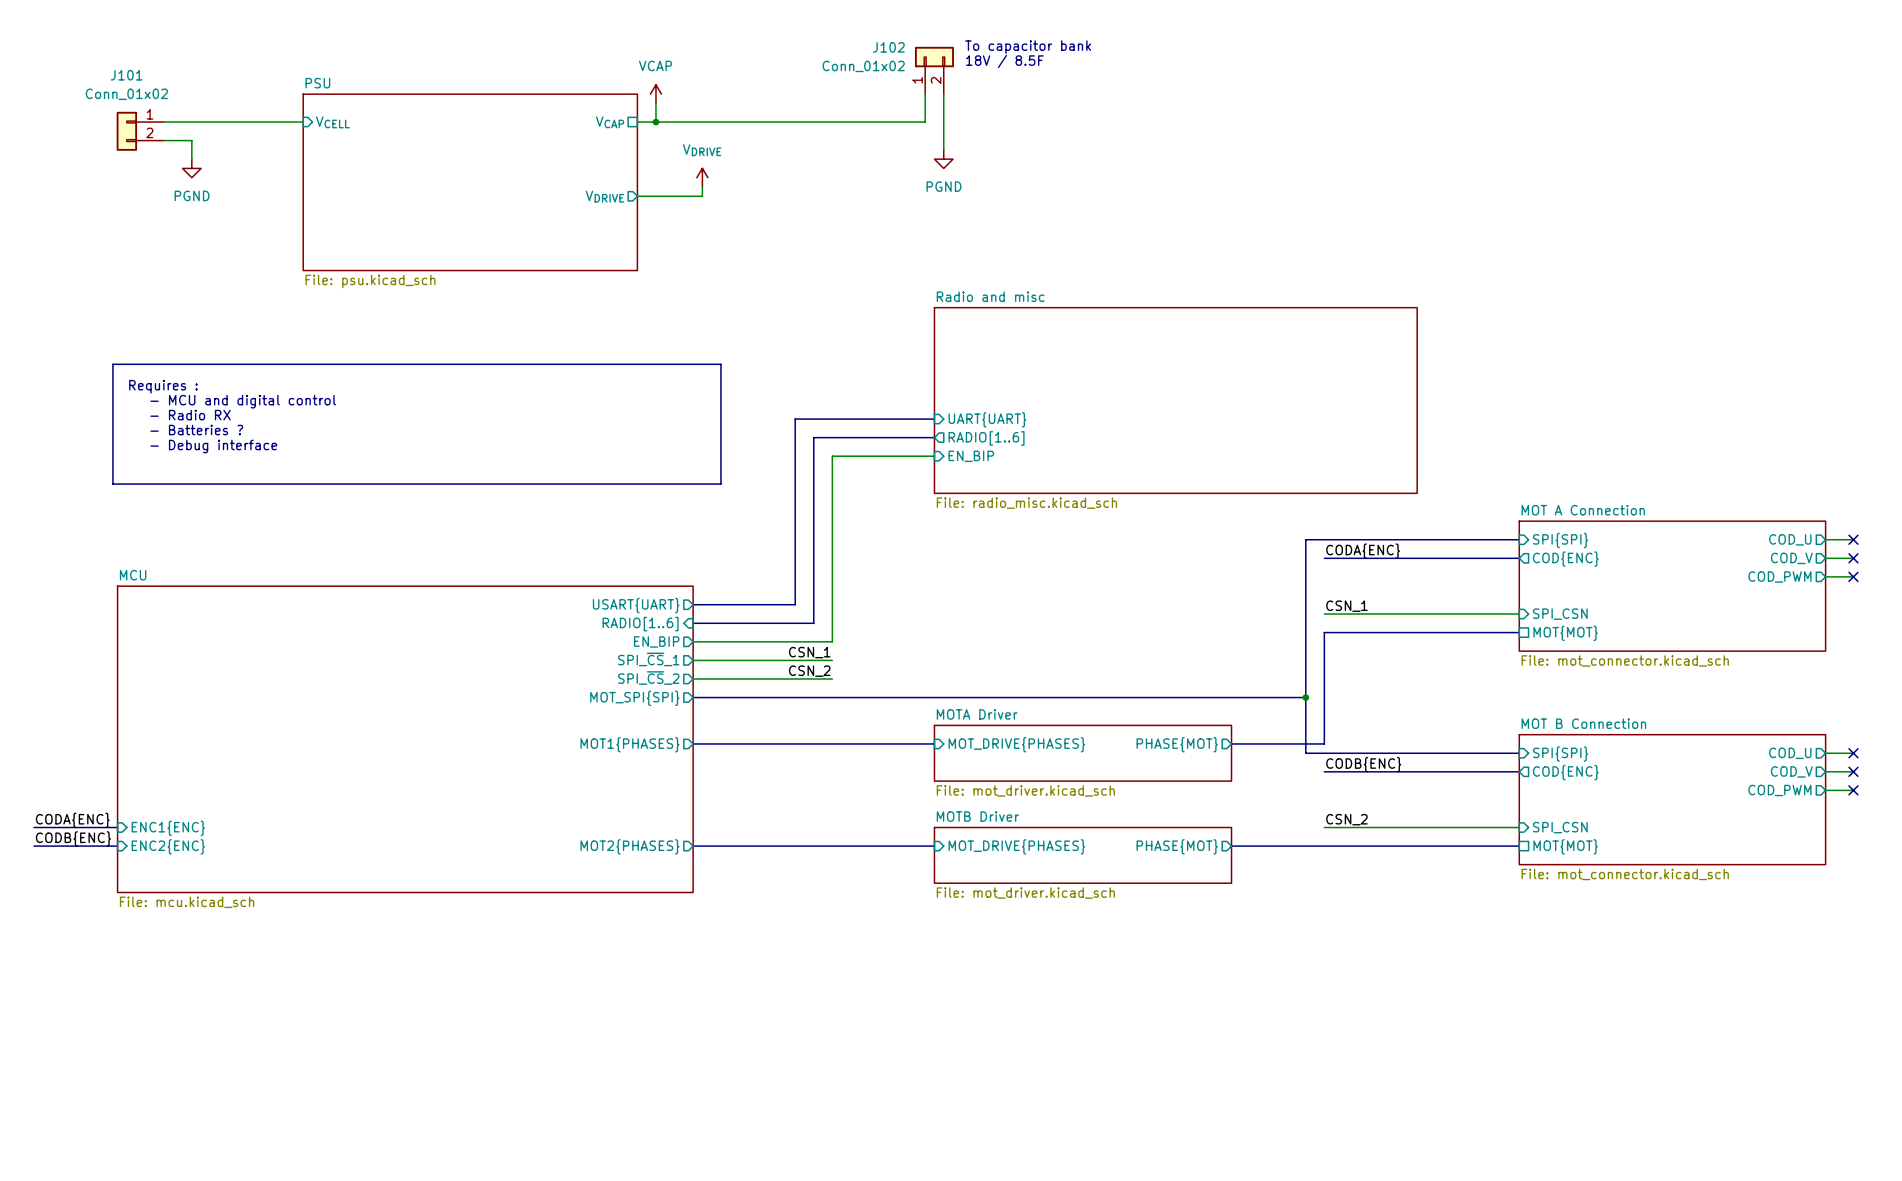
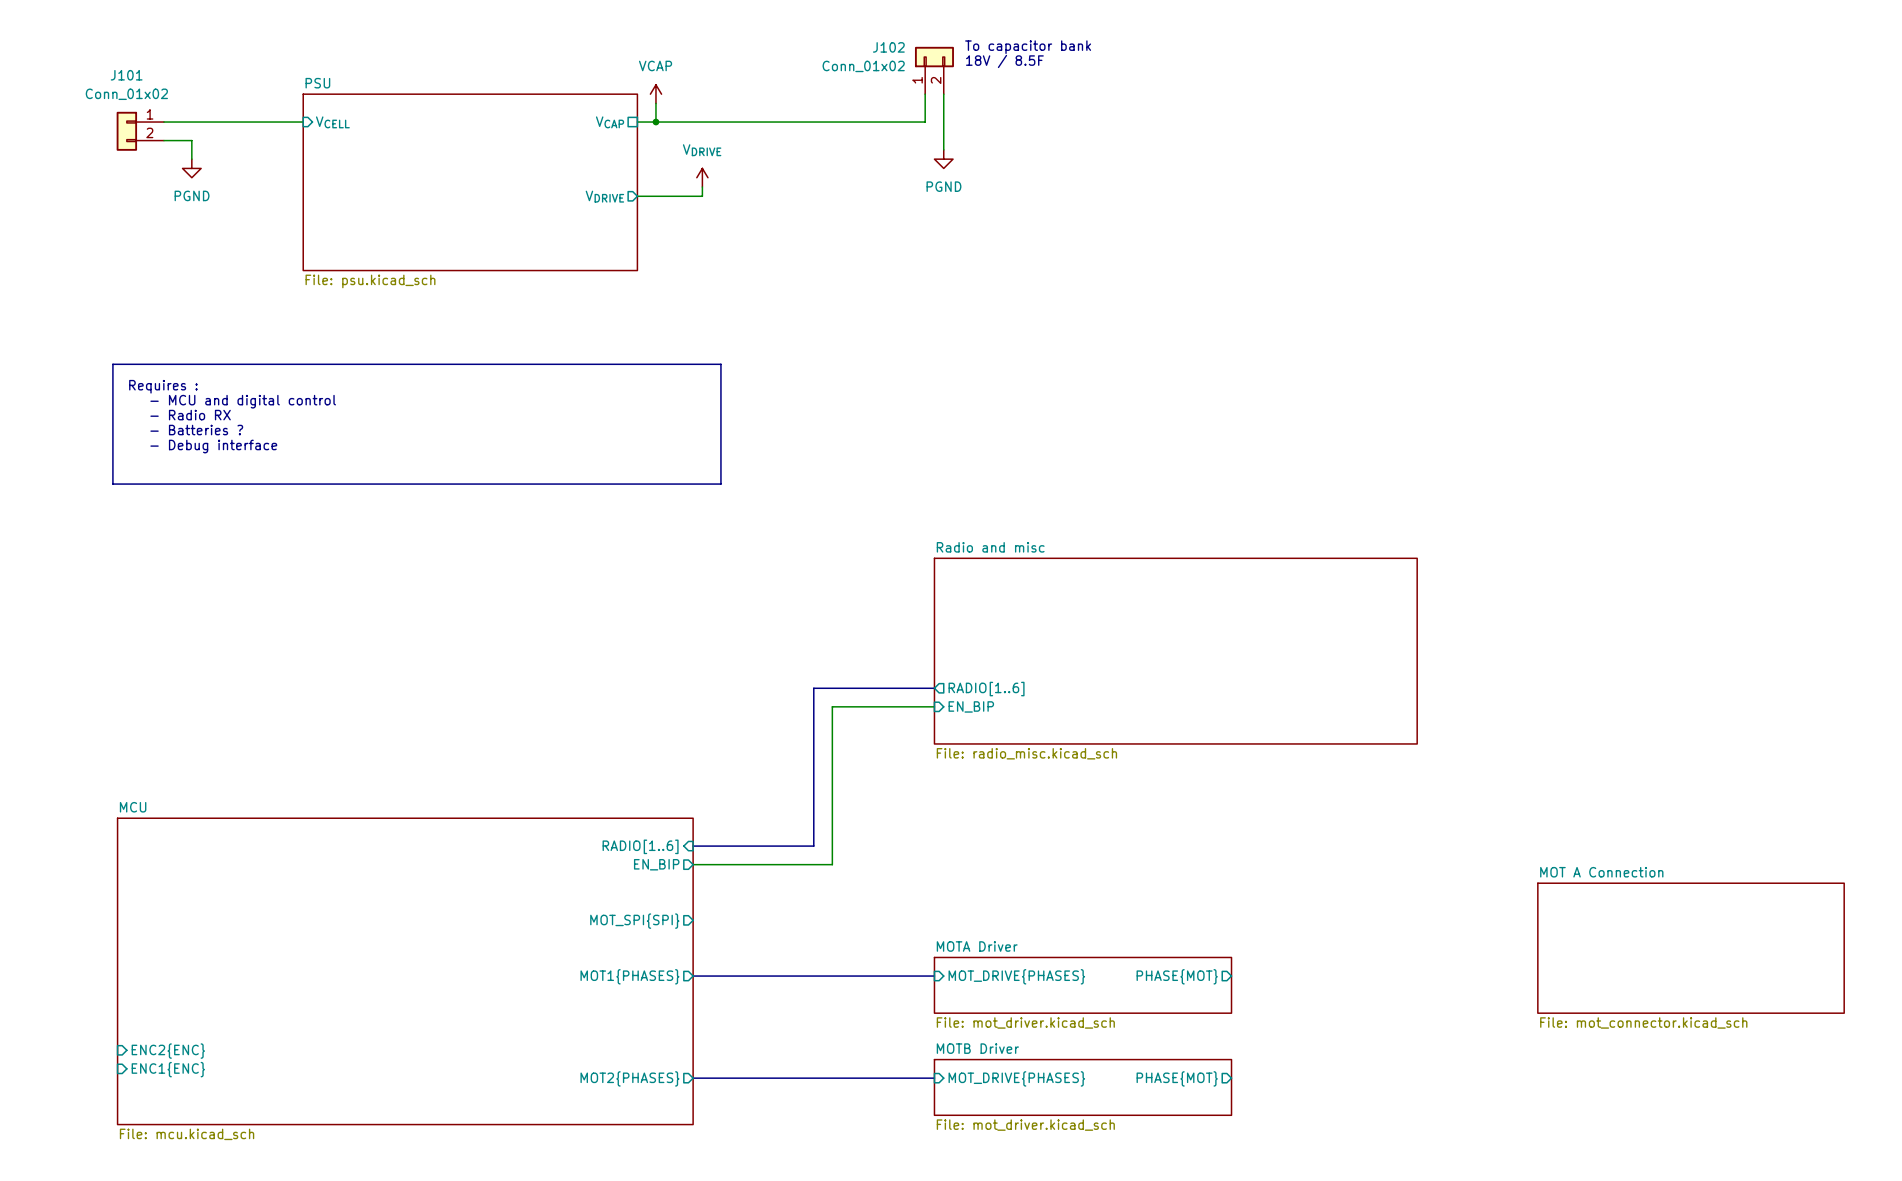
sheet Radio and misc: File: radio_misc.kicad_sch (1175, 400) -> none
bus: (934, 419) (795, 419) (795, 604) (693, 604) -> none
sheet pin: UART{UART} (987, 419) -> none
bus: (934, 437) (813, 437) (813, 623) (693, 623) -> none
sheet pin: RADIO[1..6] (986, 438) -> none
wire: (934, 456) (832, 456) (832, 641) (693, 641) -> none
sheet pin: EN_BIP (971, 456) -> none
bus: (1519, 539) (1305, 539) (1305, 753) (1519, 753) -> none
sheet pin: COD_U (1790, 539) -> none
wire: (1825, 539) (1853, 539) -> none
no-connect mark: (1853, 539) -> none
sheet pin: SPI{SPI} (1560, 540) -> none
label: CODA{ENC} (1363, 551) -> none
bus: (1324, 558) (1519, 558) -> none
sheet pin: COD_V (1791, 558) -> none
wire: (1825, 558) (1853, 558) -> none
no-connect mark: (1853, 558) -> none
sheet pin: COD{ENC} (1565, 559) -> none
sheet pin: COD_PWM (1779, 576) -> none
wire: (1825, 576) (1853, 576) -> none
no-connect mark: (1853, 576) -> none
sheet MOT A Connection: File: mot_connector.kicad_sch (1672, 586) -> none
sheet pin: USART{UART} (636, 605) -> none
label: CSN_1 (1346, 606) -> none
wire: (1324, 614) (1519, 614) -> none
sheet pin: SPI_CSN (1560, 614) -> none
sheet pin: RADIO[1..6] (640, 624) -> none
bus: (1519, 632) (1324, 632) (1324, 743) (1231, 743) -> none
sheet pin: MOT{MOT} (1565, 633) -> none
sheet pin: EN_BIP (656, 641) -> none
sheet Radio and misc: none -> File: radio_misc.kicad_sch (1175, 651)
label: CSN_1 (809, 652) -> none
sheet pin: SPI_~{CS}_1 (648, 659) -> none
wire: (693, 660) (832, 660) -> none
label: CSN_2 (809, 671) -> none
sheet pin: SPI_~{CS}_2 (648, 678) -> none
wire: (693, 678) (832, 678) -> none
sheet pin: none -> RADIO[1..6] (986, 689)
bus: (693, 697) (1305, 697) -> none
junction: (1305, 697) -> none
sheet pin: MOT_SPI{SPI} (634, 698) -> none
wire: none -> (934, 706) (832, 706) (832, 864) (693, 864)
sheet pin: none -> EN_BIP (971, 706)
sheet MCU: File: mcu.kicad_sch (405, 739) -> none
bus: (693, 743) (934, 743) -> none
sheet pin: MOT1{PHASES} (629, 744) -> none
sheet pin: MOT_DRIVE{PHASES} (1016, 744) -> none
sheet pin: PHASE{MOT} (1177, 744) -> none
sheet MOTA Driver: File: mot_driver.kicad_sch (1082, 753) -> none
sheet pin: COD_U (1790, 753) -> none
wire: (1825, 753) (1853, 753) -> none
no-connect mark: (1853, 753) -> none
sheet pin: SPI{SPI} (1560, 754) -> none
label: CODB{ENC} (1363, 764) -> none
bus: (1324, 771) (1519, 771) -> none
sheet pin: COD_V (1791, 771) -> none
wire: (1825, 771) (1853, 771) -> none
no-connect mark: (1853, 771) -> none
sheet pin: COD{ENC} (1565, 772) -> none
sheet pin: COD_PWM (1779, 790) -> none
wire: (1825, 790) (1853, 790) -> none
no-connect mark: (1853, 790) -> none
sheet MOT B Connection: File: mot_connector.kicad_sch (1672, 799) -> none
label: CSN_2 (1346, 819) -> none
label: CODA{ENC} (72, 820) -> none
bus: (34, 827) (117, 827) -> none
wire: (1324, 827) (1519, 827) -> none
sheet pin: SPI_CSN (1560, 827) -> none
sheet pin: ENC1{ENC} (168, 828) -> none
label: CODB{ENC} (73, 838) -> none
bus: (34, 846) (117, 846) -> none
sheet pin: ENC2{ENC} (168, 846) -> none
sheet pin shape: output (629, 846) -> input (640, 846)
sheet pin: MOT2{PHASES} (629, 846) -> RADIO[1..6] (640, 846)
bus: (813, 846) (934, 846) -> (813, 846) (813, 688) (934, 688)
sheet pin: MOT_DRIVE{PHASES} (1016, 846) -> none
sheet pin: PHASE{MOT} (1177, 846) -> none
bus: (1231, 846) (1519, 846) -> none
sheet pin: MOT{MOT} (1565, 846) -> none
sheet MOTB Driver: File: mot_driver.kicad_sch (1082, 855) -> none
sheet pin: none -> EN_BIP (656, 864)
sheet pin: none -> MOT_SPI{SPI} (634, 921)
sheet MOT A Connection: none -> File: mot_connector.kicad_sch (1691, 948)
sheet MCU: none -> File: mcu.kicad_sch (405, 971)
sheet pin: none -> MOT1{PHASES} (629, 976)
bus: none -> (693, 976) (934, 976)
sheet pin: none -> MOT_DRIVE{PHASES} (1016, 976)
sheet pin: none -> PHASE{MOT} (1177, 976)
sheet MOTA Driver: none -> File: mot_driver.kicad_sch (1082, 985)
sheet pin: none -> ENC2{ENC} (168, 1051)
sheet pin: none -> ENC1{ENC} (168, 1069)
sheet pin: none -> MOT2{PHASES} (629, 1078)
bus: none -> (693, 1078) (934, 1078)
sheet pin: none -> MOT_DRIVE{PHASES} (1016, 1078)
sheet pin: none -> PHASE{MOT} (1177, 1078)
sheet MOTB Driver: none -> File: mot_driver.kicad_sch (1082, 1087)

